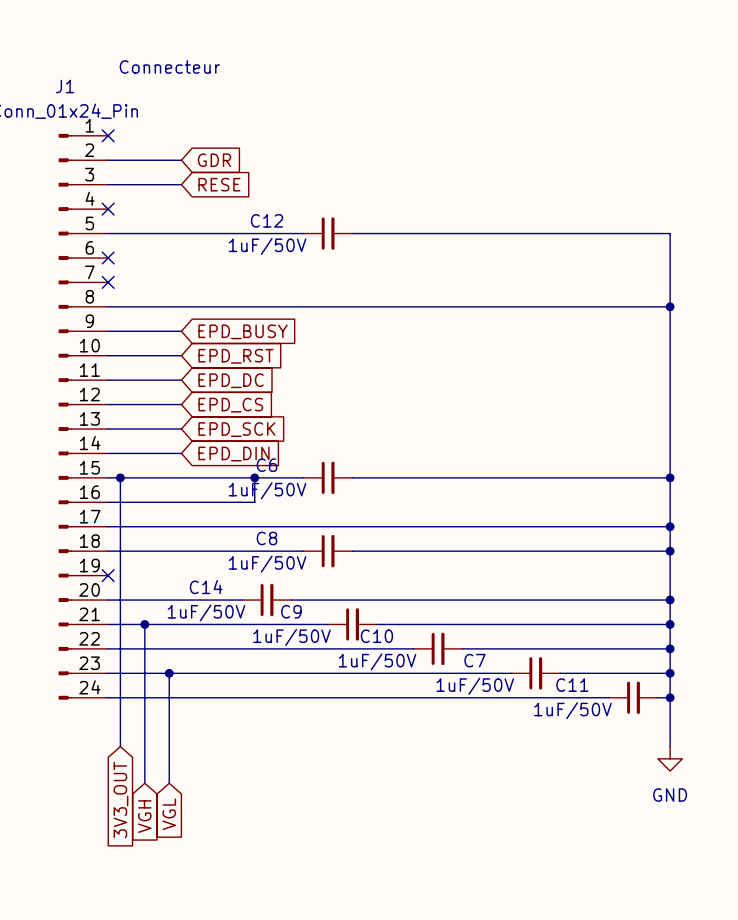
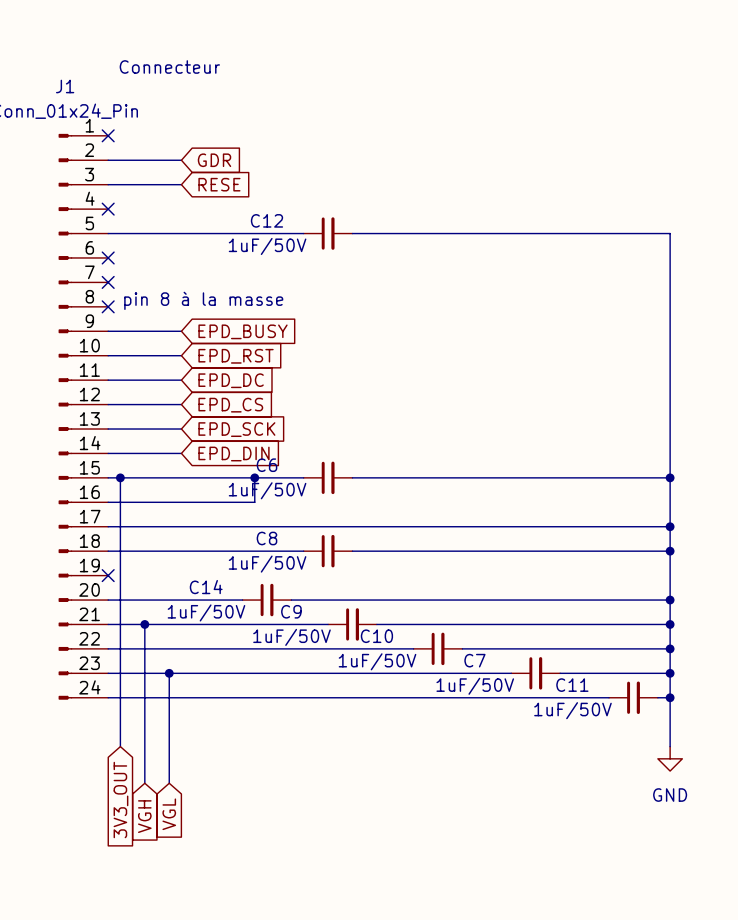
text: none -> pin 8 à la masse (203, 300)
wire: (108, 306) (670, 306) -> none
no-connect mark: none -> (108, 306)
junction: (670, 306) -> none

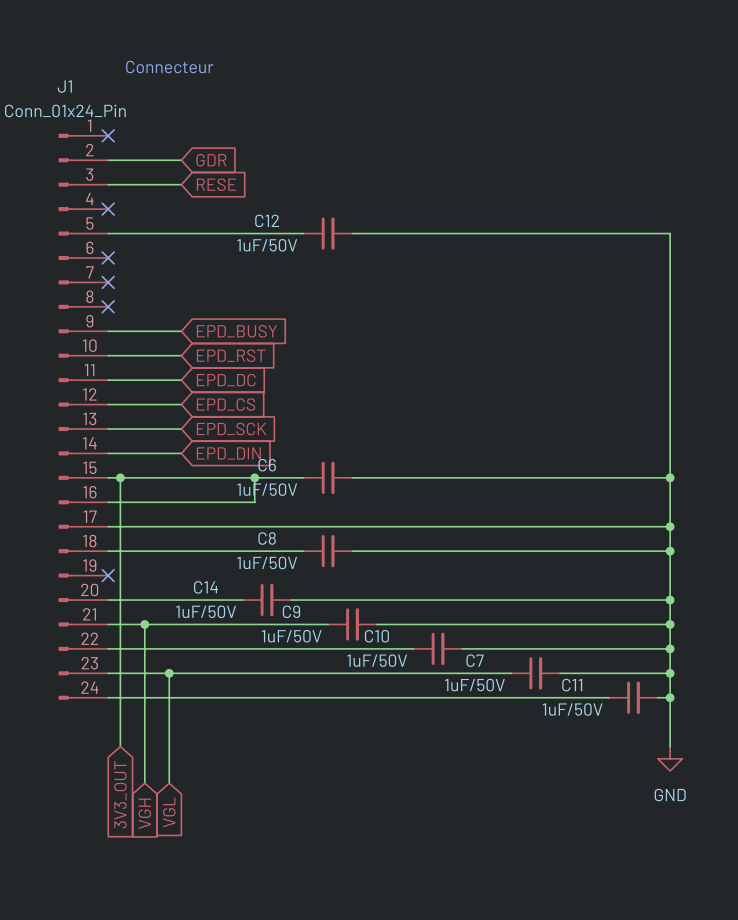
text: pin 8 à la masse (203, 300) -> none

